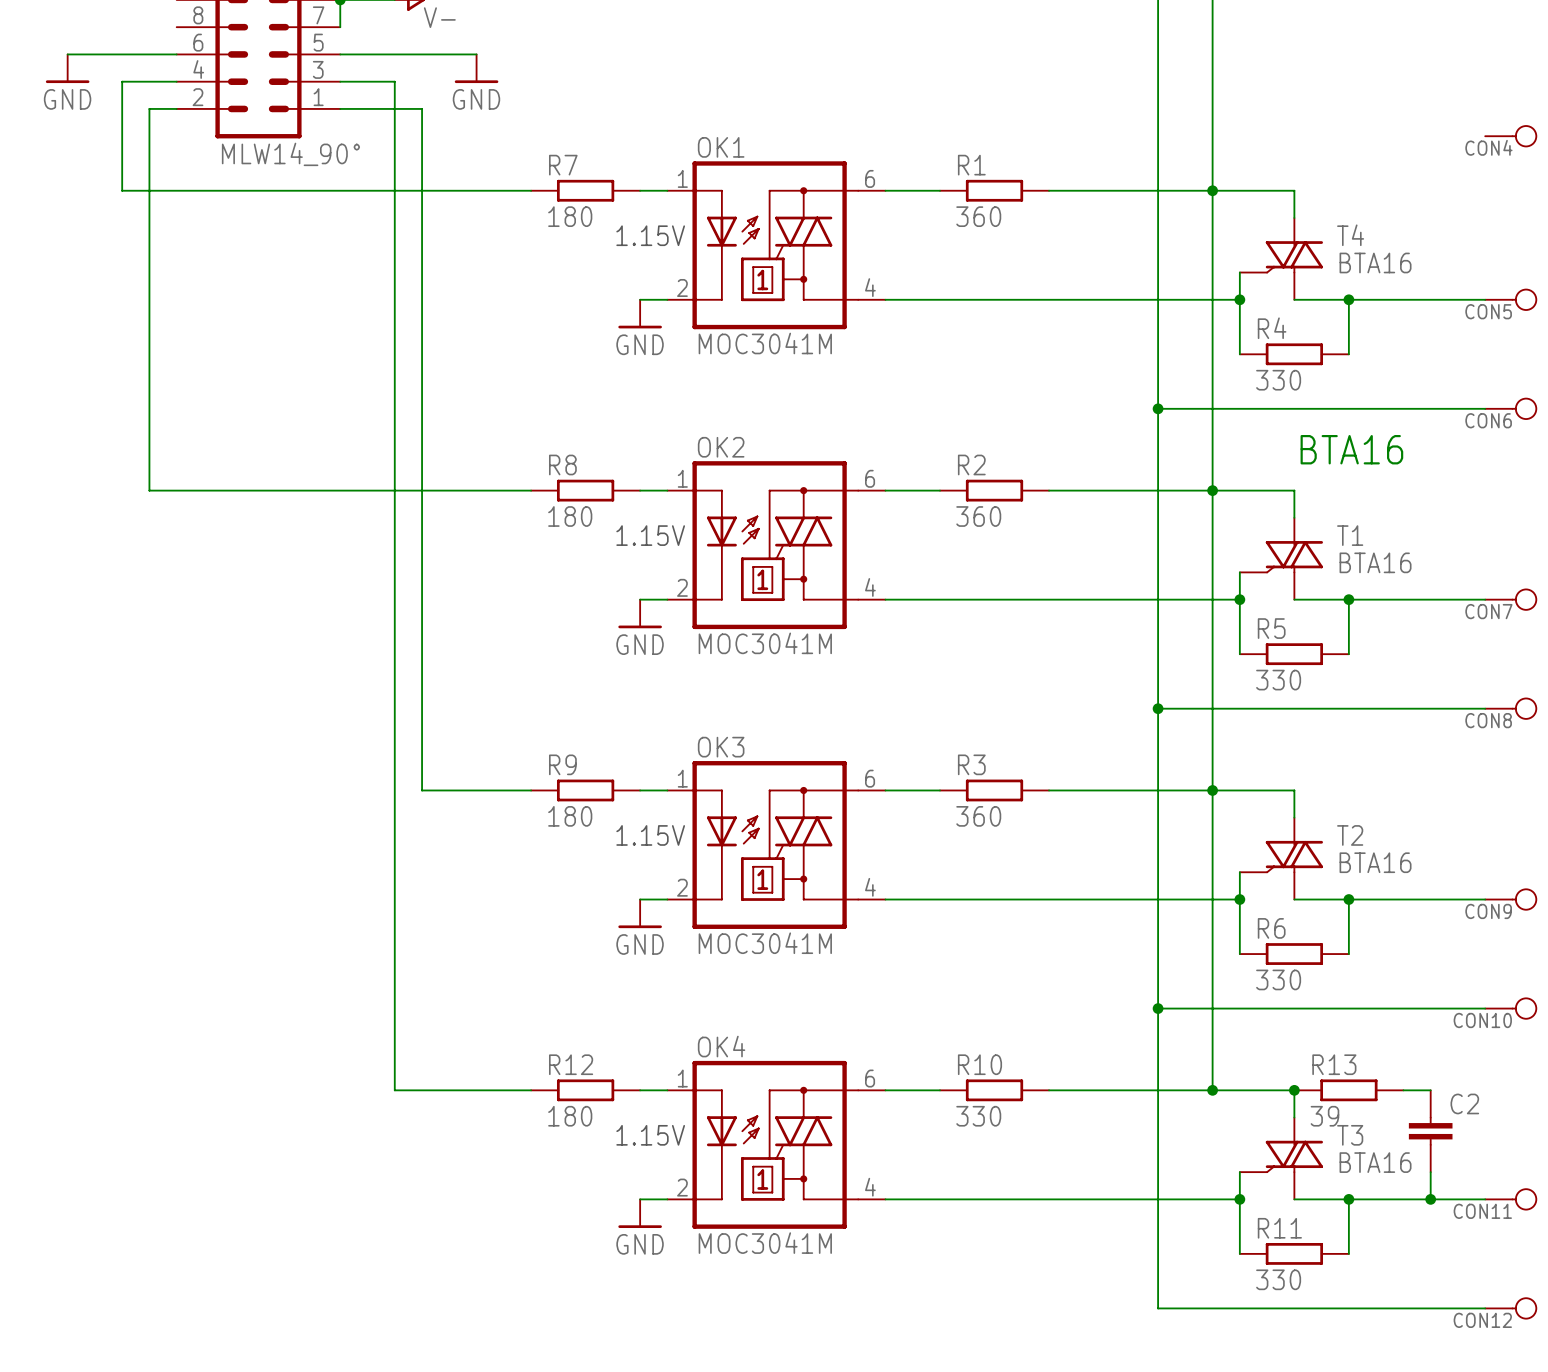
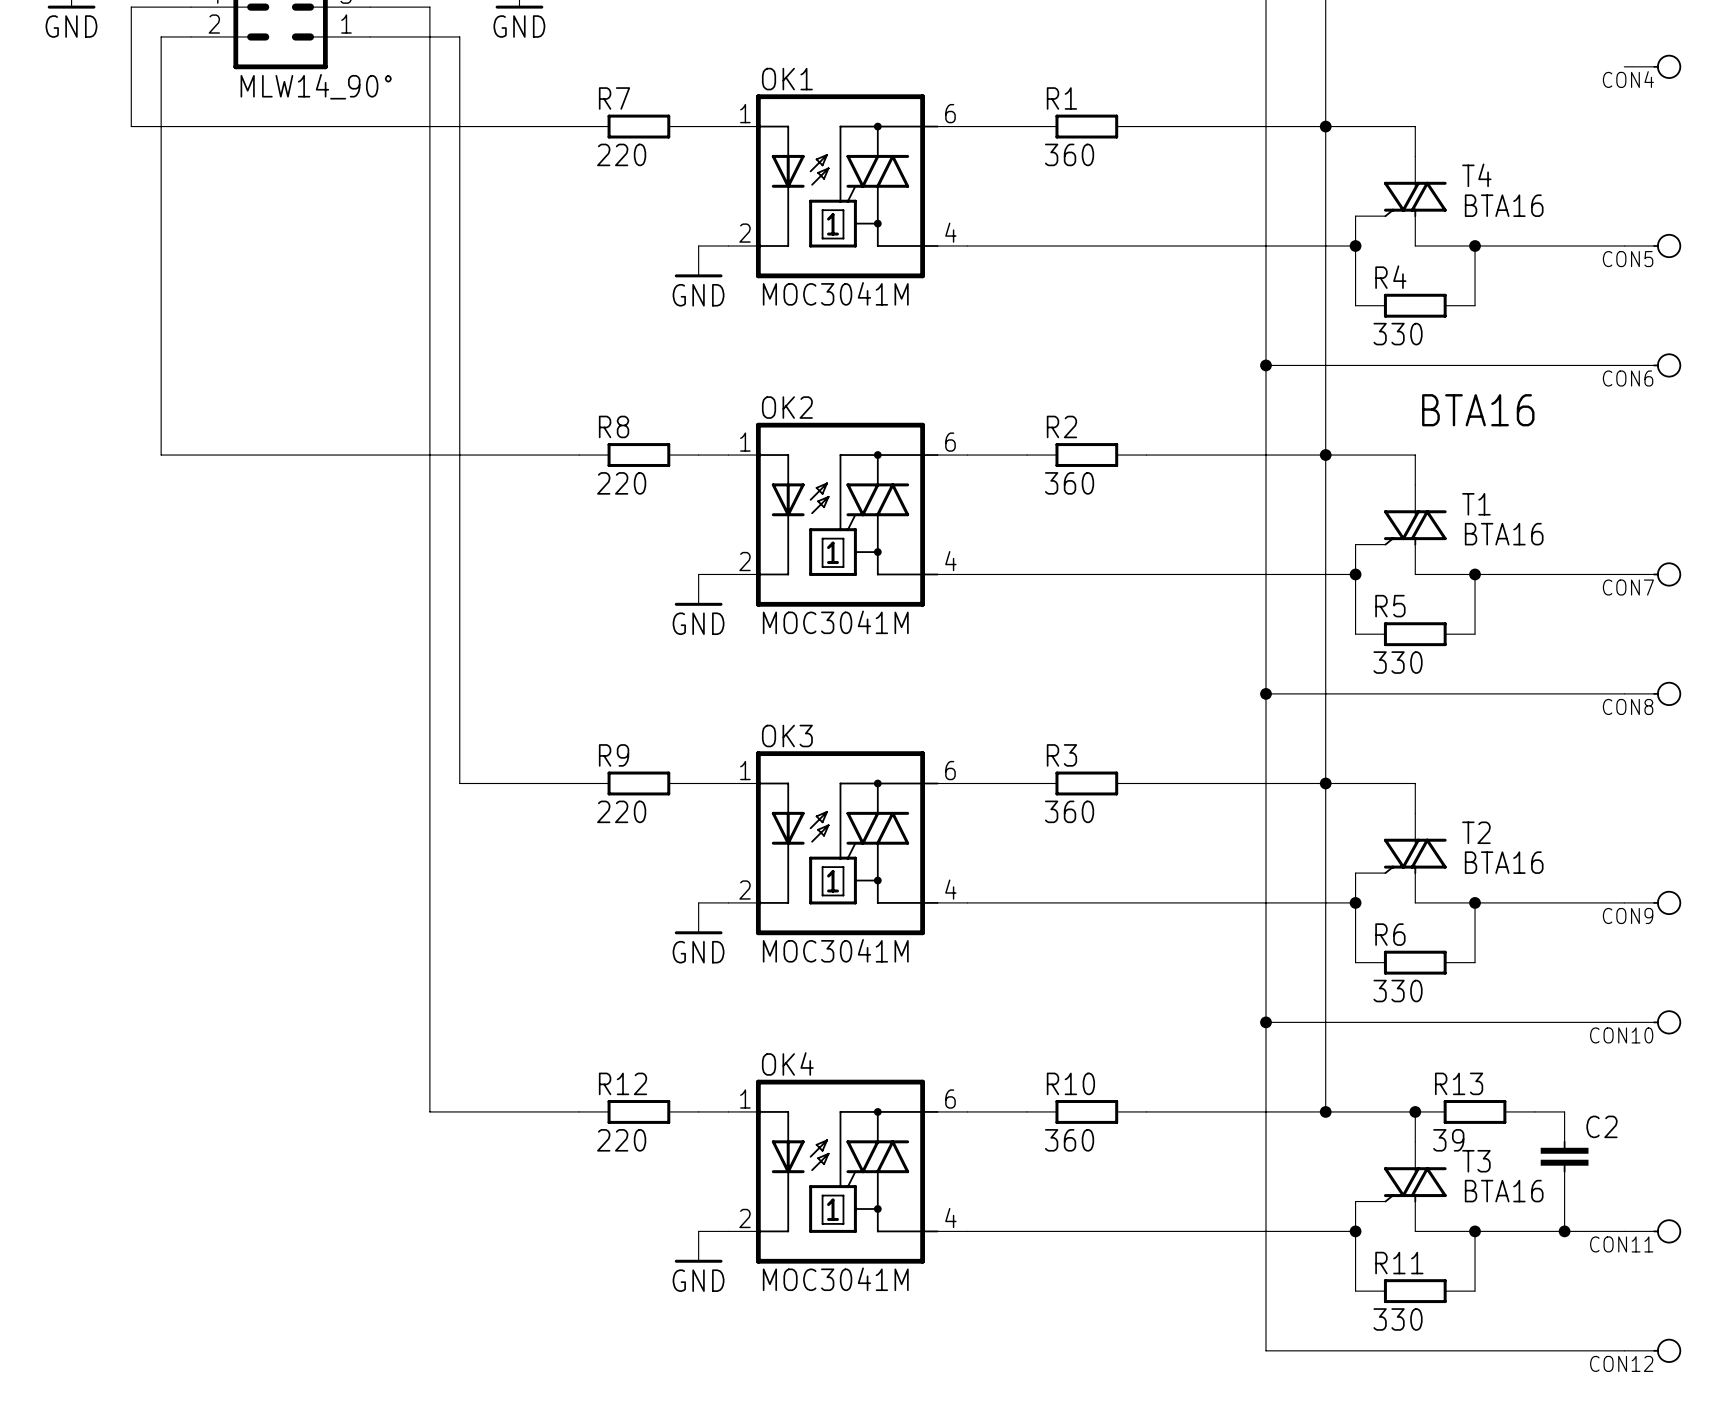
R7 value: 180 (570, 216) -> 220 (621, 154)
text: 1.15V (650, 235) -> none
R8 value: 180 (570, 516) -> 220 (621, 483)
text: 1.15V (650, 535) -> none
R9 value: 180 (570, 816) -> 220 (621, 811)
text: 1.15V (650, 835) -> none
R12 value: 180 (570, 1116) -> 220 (621, 1140)
R10 value: 330 (978, 1116) -> 360 (1069, 1140)
text: 1.15V (650, 1135) -> none

